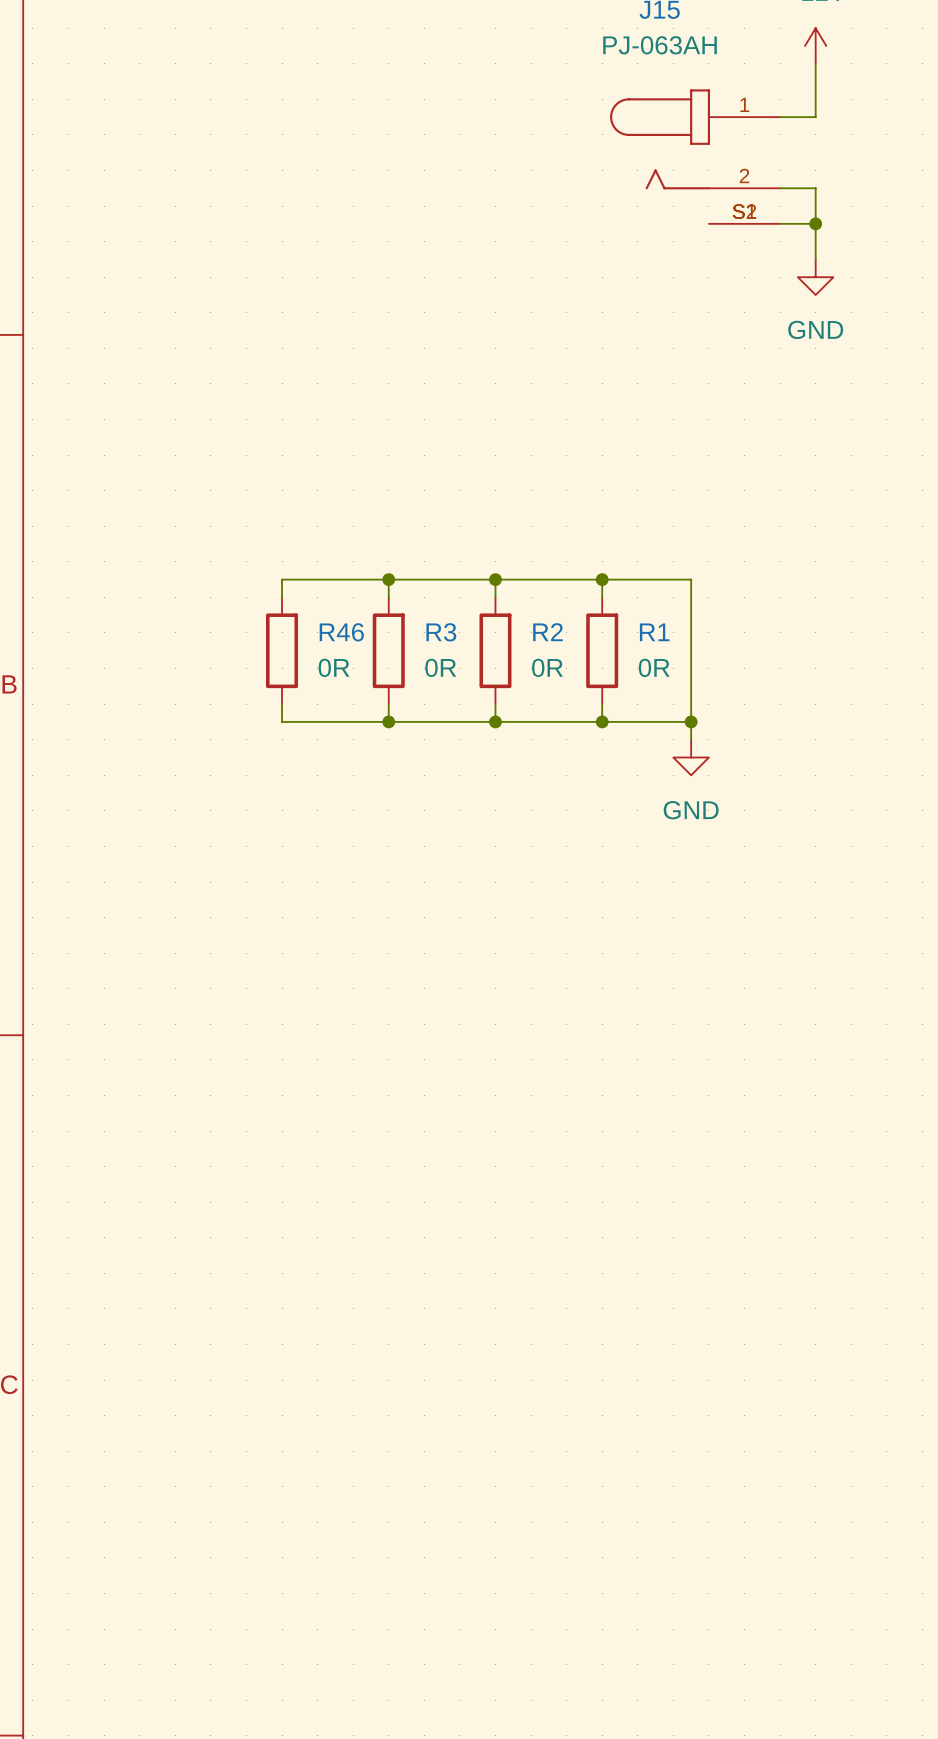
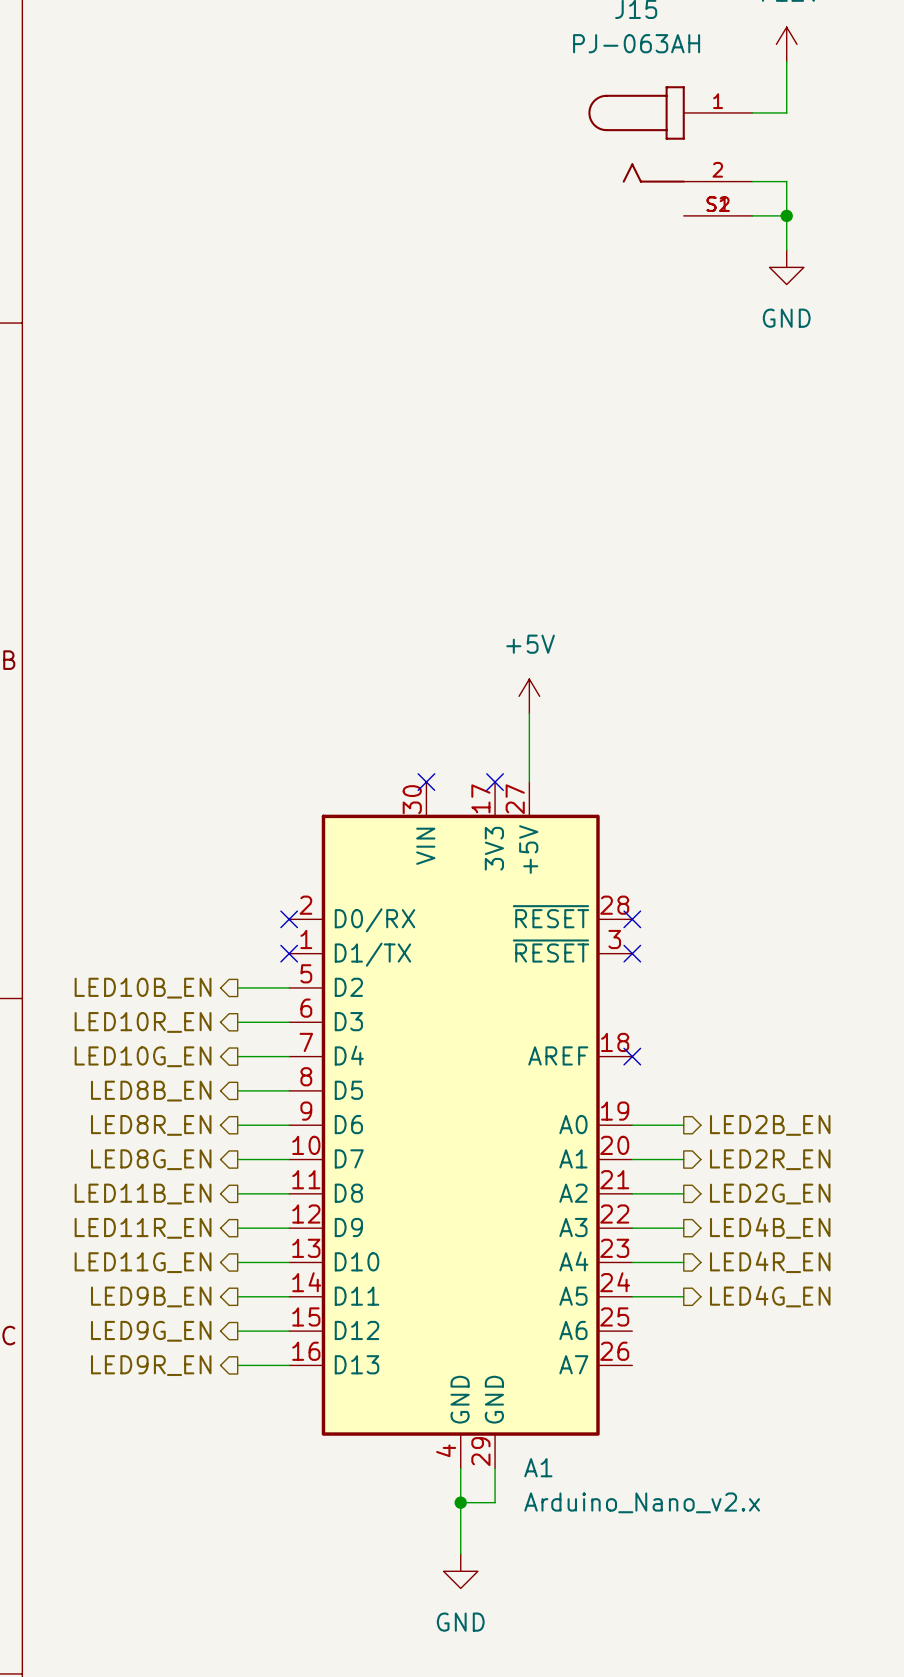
wire: (388, 579) (388, 597) -> none
junction: (388, 579) -> none
wire: (495, 579) (495, 597) -> none
junction: (495, 579) -> none
wire: (602, 579) (602, 597) -> none
junction: (602, 579) -> none
wire: (282, 597) (282, 579) (691, 579) (691, 739) -> none
R46: 0R (282, 650) -> none
R3: 0R (388, 650) -> none
R2: 0R (495, 650) -> none
R1: 0R (602, 650) -> none
wire: (282, 704) (282, 721) (691, 721) -> none
wire: (388, 704) (388, 721) -> none
wire: (495, 704) (495, 721) -> none
wire: (602, 704) (602, 721) -> none
junction: (388, 721) -> none
junction: (495, 721) -> none
power symbol: none -> +5V (529, 696)
junction: (602, 721) -> none
junction: (691, 721) -> none
wire: none -> (529, 713) (529, 782)
power symbol: GND (691, 757) -> none
no-connect mark: none -> (426, 782)
no-connect mark: none -> (495, 782)
no-connect mark: none -> (289, 919)
no-connect mark: none -> (632, 919)
no-connect mark: none -> (289, 953)
no-connect mark: none -> (632, 953)
wire: none -> (237, 987) (289, 987)
hierarchical label: none -> LED10B_EN (143, 988)
wire: none -> (237, 1022) (289, 1022)
hierarchical label: none -> LED10R_EN (143, 1022)
wire: none -> (237, 1056) (289, 1056)
no-connect mark: none -> (632, 1056)
hierarchical label: none -> LED10G_EN (143, 1056)
wire: none -> (237, 1090) (289, 1090)
hierarchical label: none -> LED8B_EN (151, 1091)
wire: none -> (237, 1125) (289, 1125)
A1: none -> Arduino_Nano_v2.x (460, 1125)
wire: none -> (632, 1125) (683, 1125)
hierarchical label: none -> LED8R_EN (151, 1125)
hierarchical label: none -> LED2B_EN (770, 1125)
wire: none -> (237, 1159) (289, 1159)
wire: none -> (632, 1159) (683, 1159)
hierarchical label: none -> LED8G_EN (151, 1159)
hierarchical label: none -> LED2R_EN (770, 1159)
wire: none -> (237, 1193) (289, 1193)
wire: none -> (632, 1193) (683, 1193)
hierarchical label: none -> LED11B_EN (143, 1194)
hierarchical label: none -> LED2G_EN (770, 1194)
wire: none -> (237, 1228) (289, 1228)
wire: none -> (632, 1228) (683, 1228)
hierarchical label: none -> LED11R_EN (143, 1228)
hierarchical label: none -> LED4B_EN (770, 1227)
wire: none -> (237, 1262) (289, 1262)
wire: none -> (632, 1262) (683, 1262)
hierarchical label: none -> LED11G_EN (143, 1262)
hierarchical label: none -> LED4R_EN (770, 1262)
wire: none -> (237, 1296) (289, 1296)
wire: none -> (632, 1296) (683, 1296)
hierarchical label: none -> LED9B_EN (151, 1296)
hierarchical label: none -> LED4G_EN (770, 1296)
wire: none -> (237, 1331) (289, 1331)
hierarchical label: none -> LED9G_EN (151, 1331)
wire: none -> (237, 1365) (289, 1365)
hierarchical label: none -> LED9R_EN (151, 1365)
wire: none -> (460, 1468) (460, 1554)
wire: none -> (495, 1468) (495, 1502) (460, 1502)
junction: none -> (460, 1502)
power symbol: none -> GND (460, 1571)

